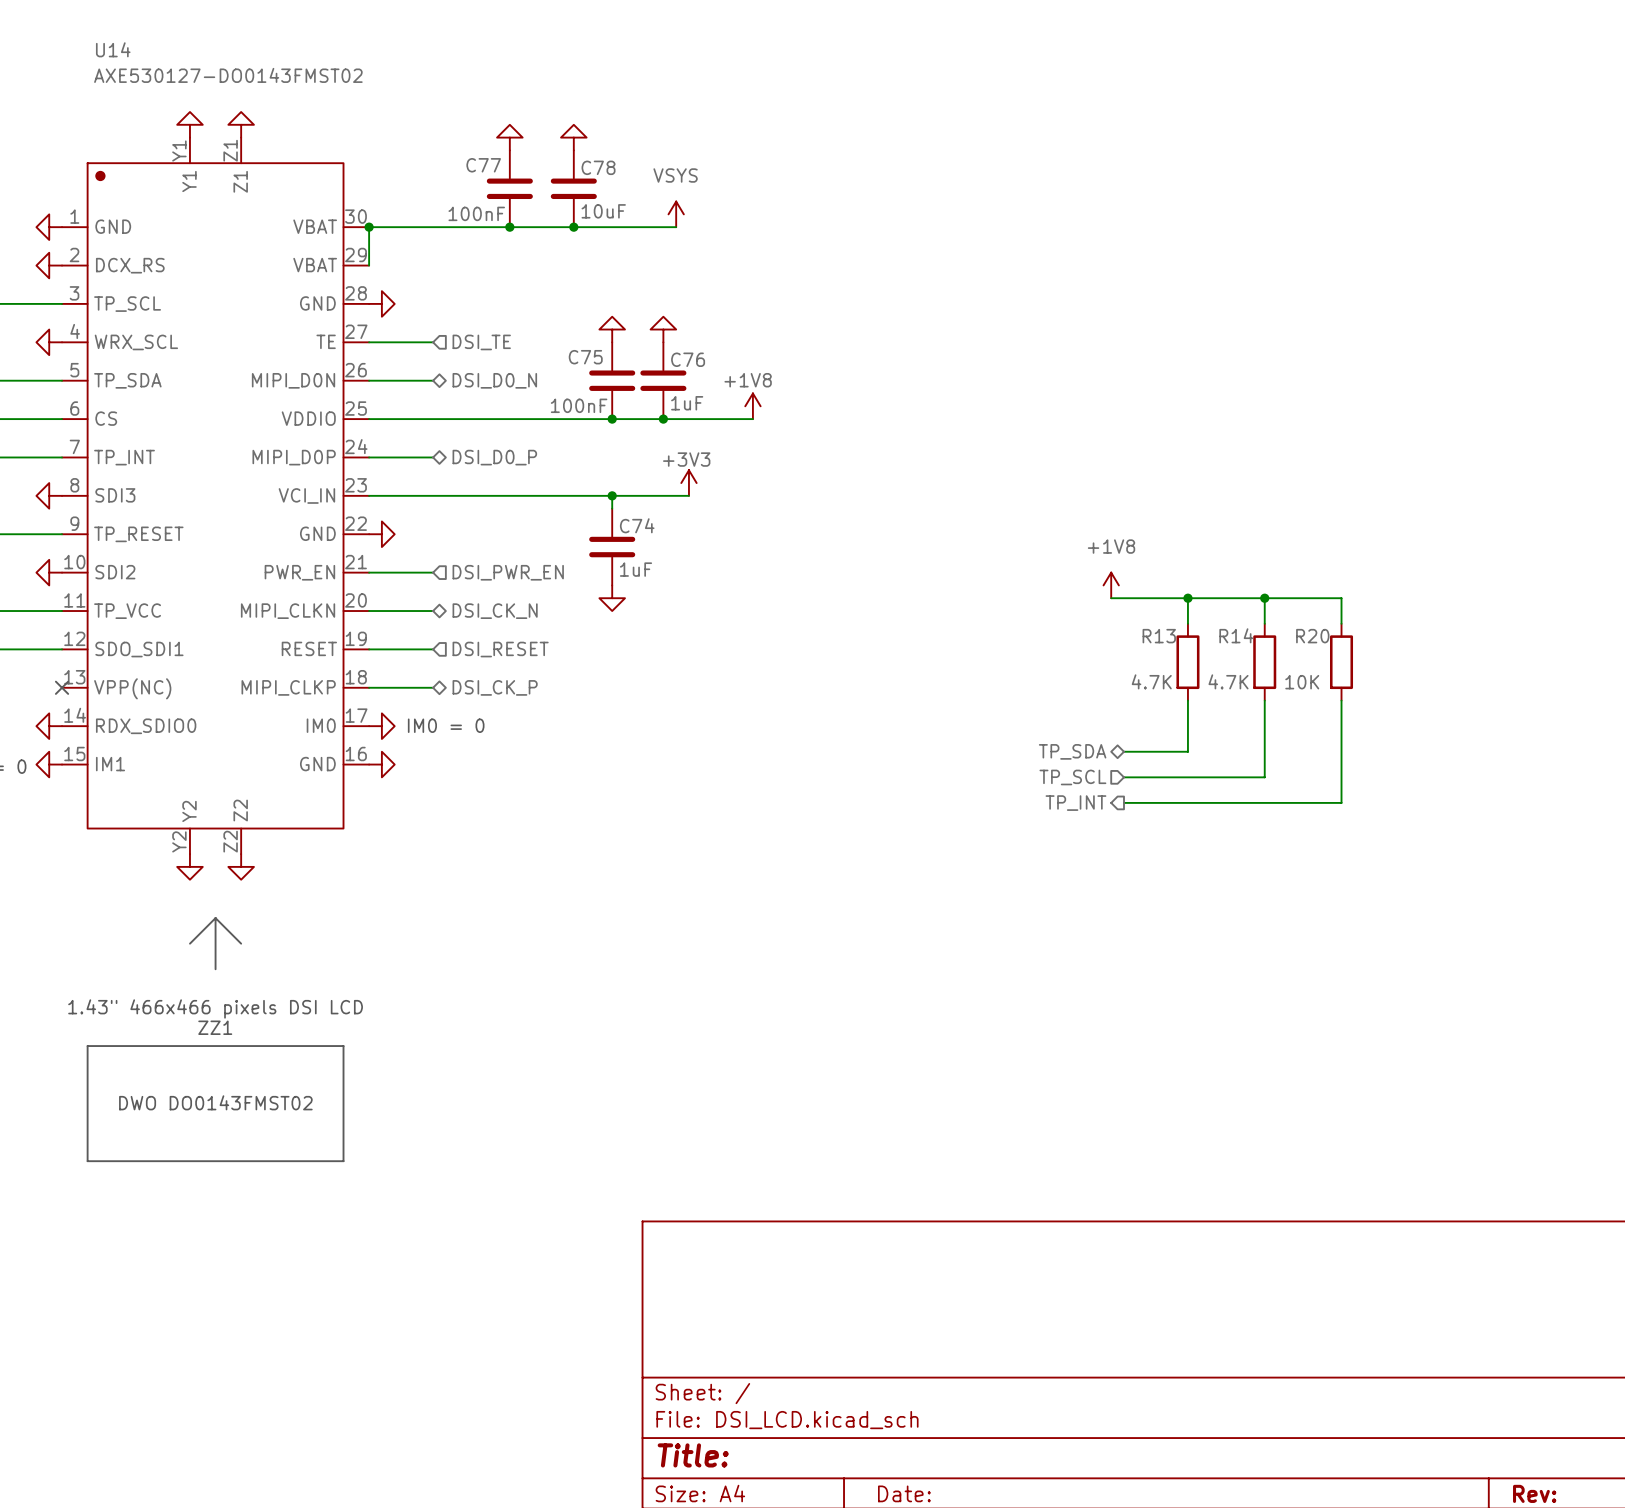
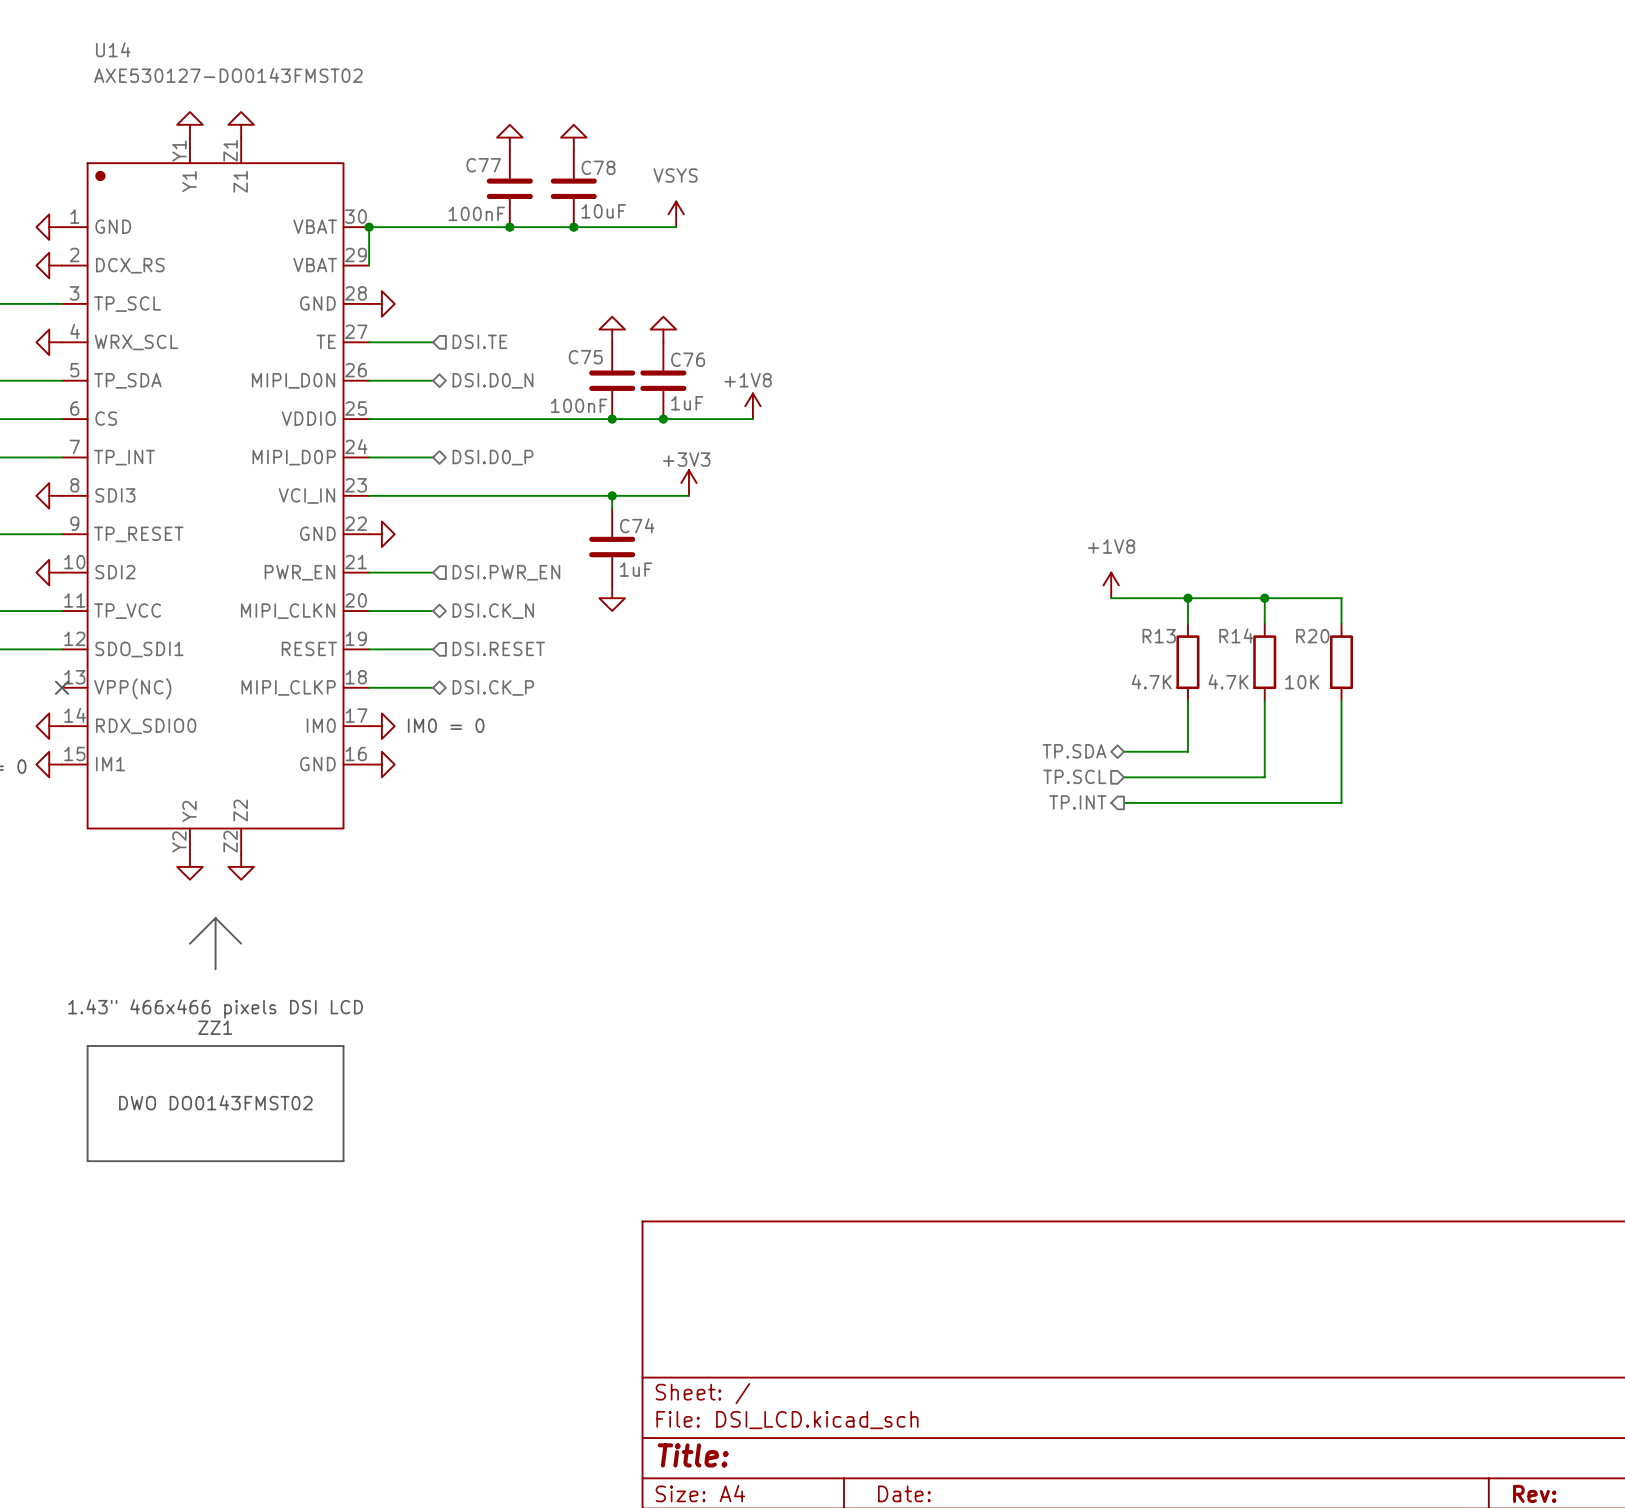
hierarchical label: DSI_TE (481, 342) -> DSI.TE (479, 341)
hierarchical label: DSI_D0_N (494, 380) -> DSI.D0_N (492, 380)
hierarchical label: DSI_D0_P (494, 457) -> DSI.D0_P (492, 457)
hierarchical label: DSI_PWR_EN (508, 572) -> DSI.PWR_EN (506, 572)
hierarchical label: DSI_CK_N (495, 611) -> DSI.CK_N (493, 611)
hierarchical label: DSI_RESET (500, 649) -> DSI.RESET (498, 648)
hierarchical label: DSI_CK_P (495, 687) -> DSI.CK_P (493, 687)
hierarchical label: TP_SDA (1072, 751) -> TP.SDA (1074, 751)
hierarchical label: TP_SCL (1072, 777) -> TP.SCL (1074, 776)
hierarchical label: TP_INT (1075, 803) -> TP.INT (1077, 802)

